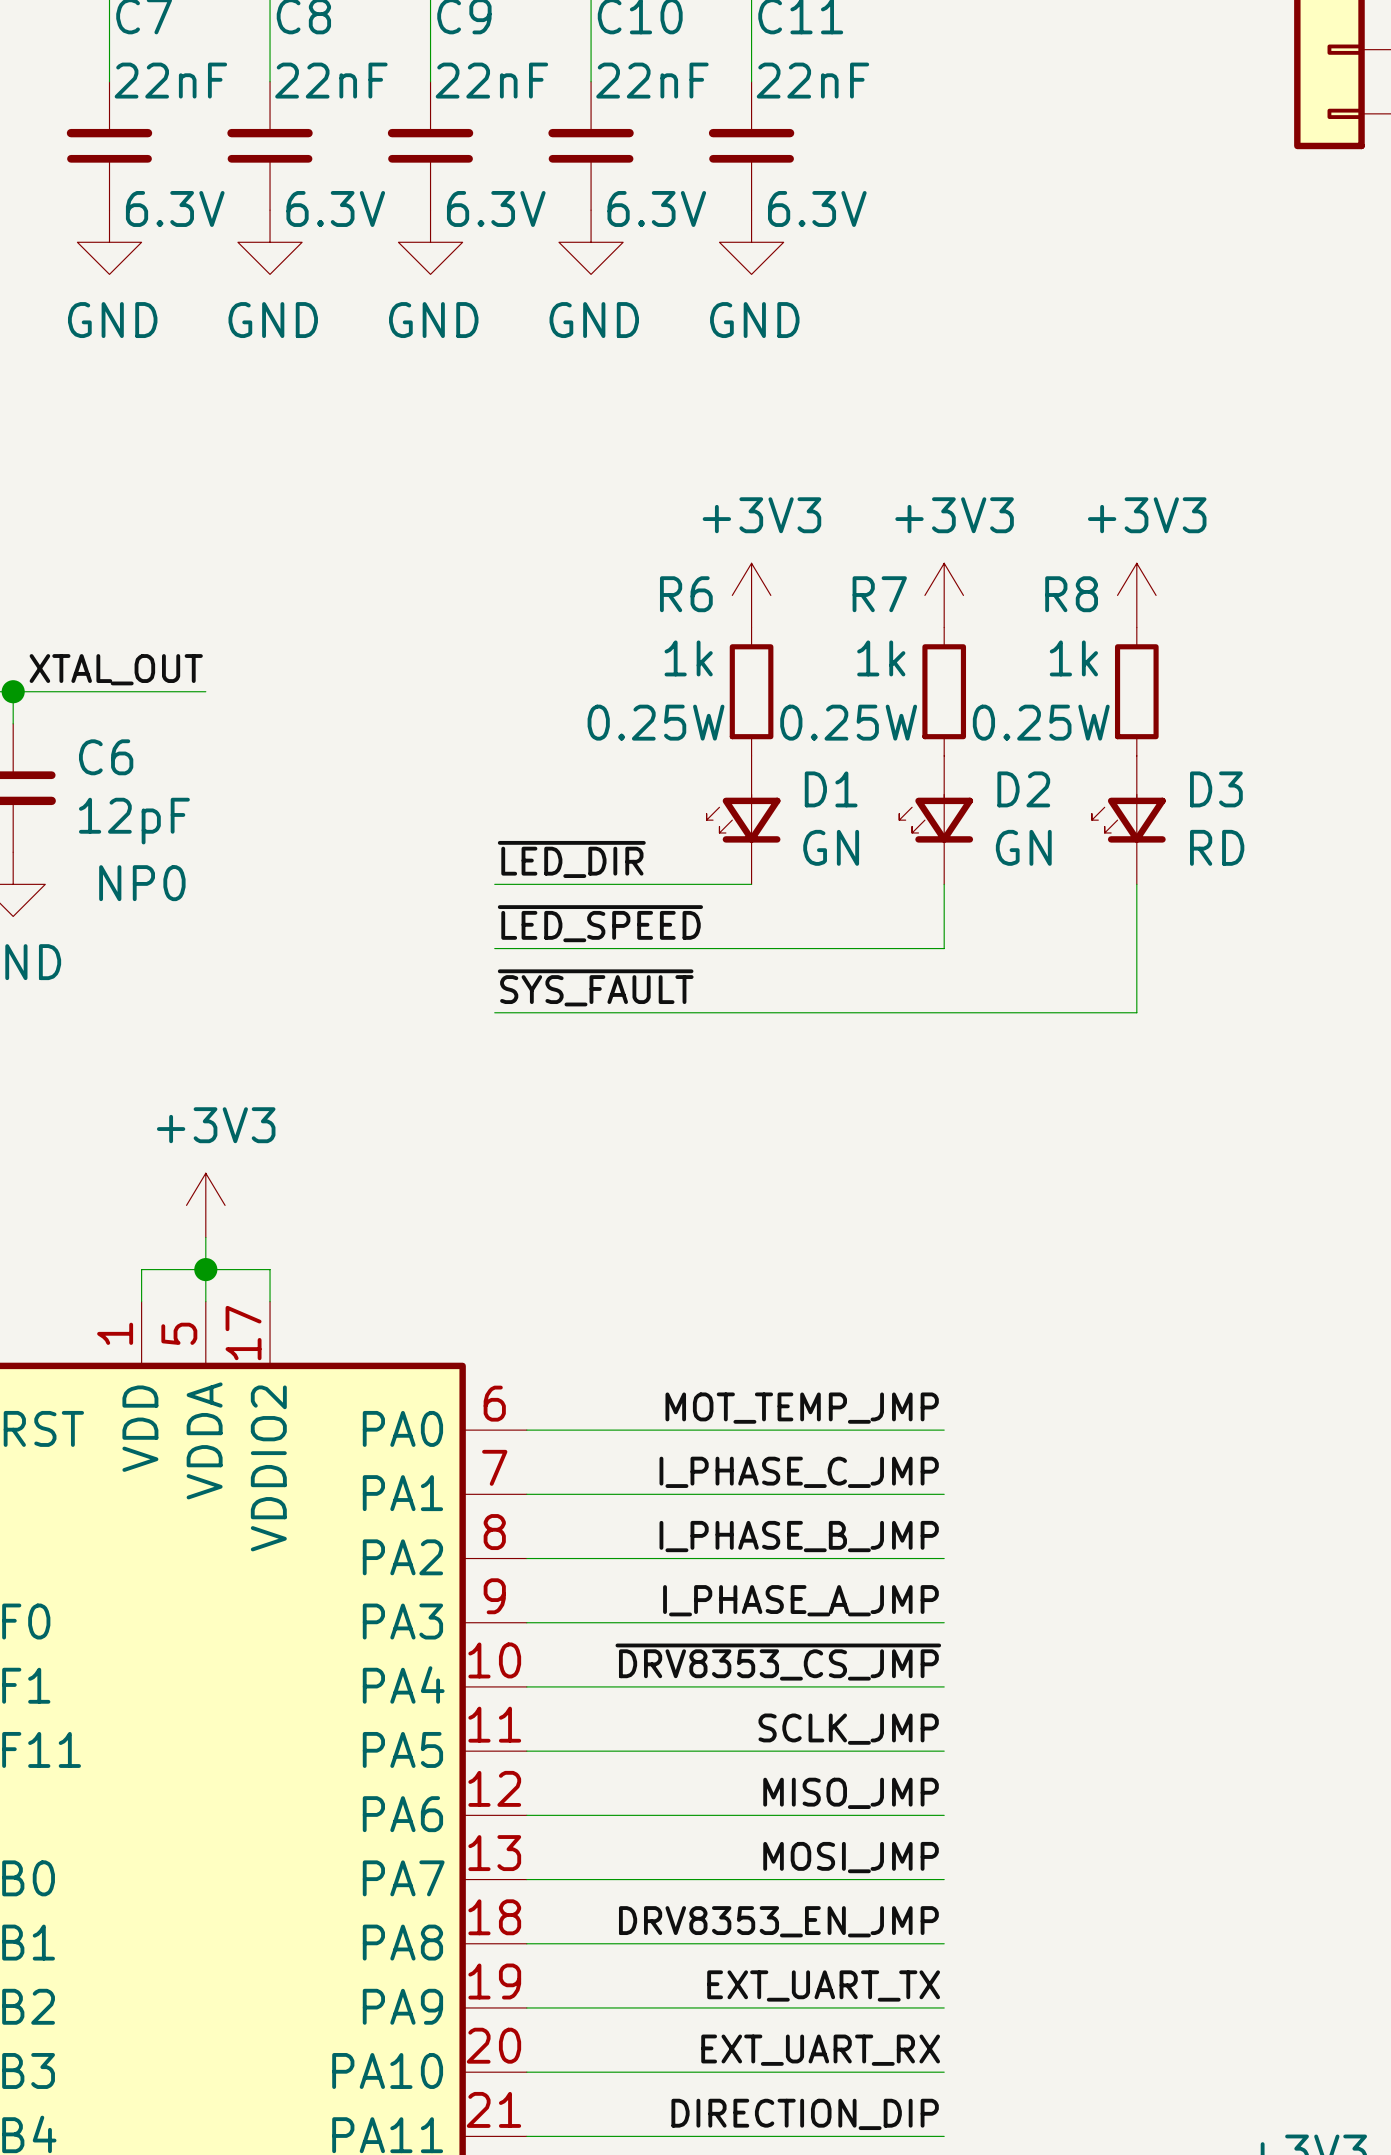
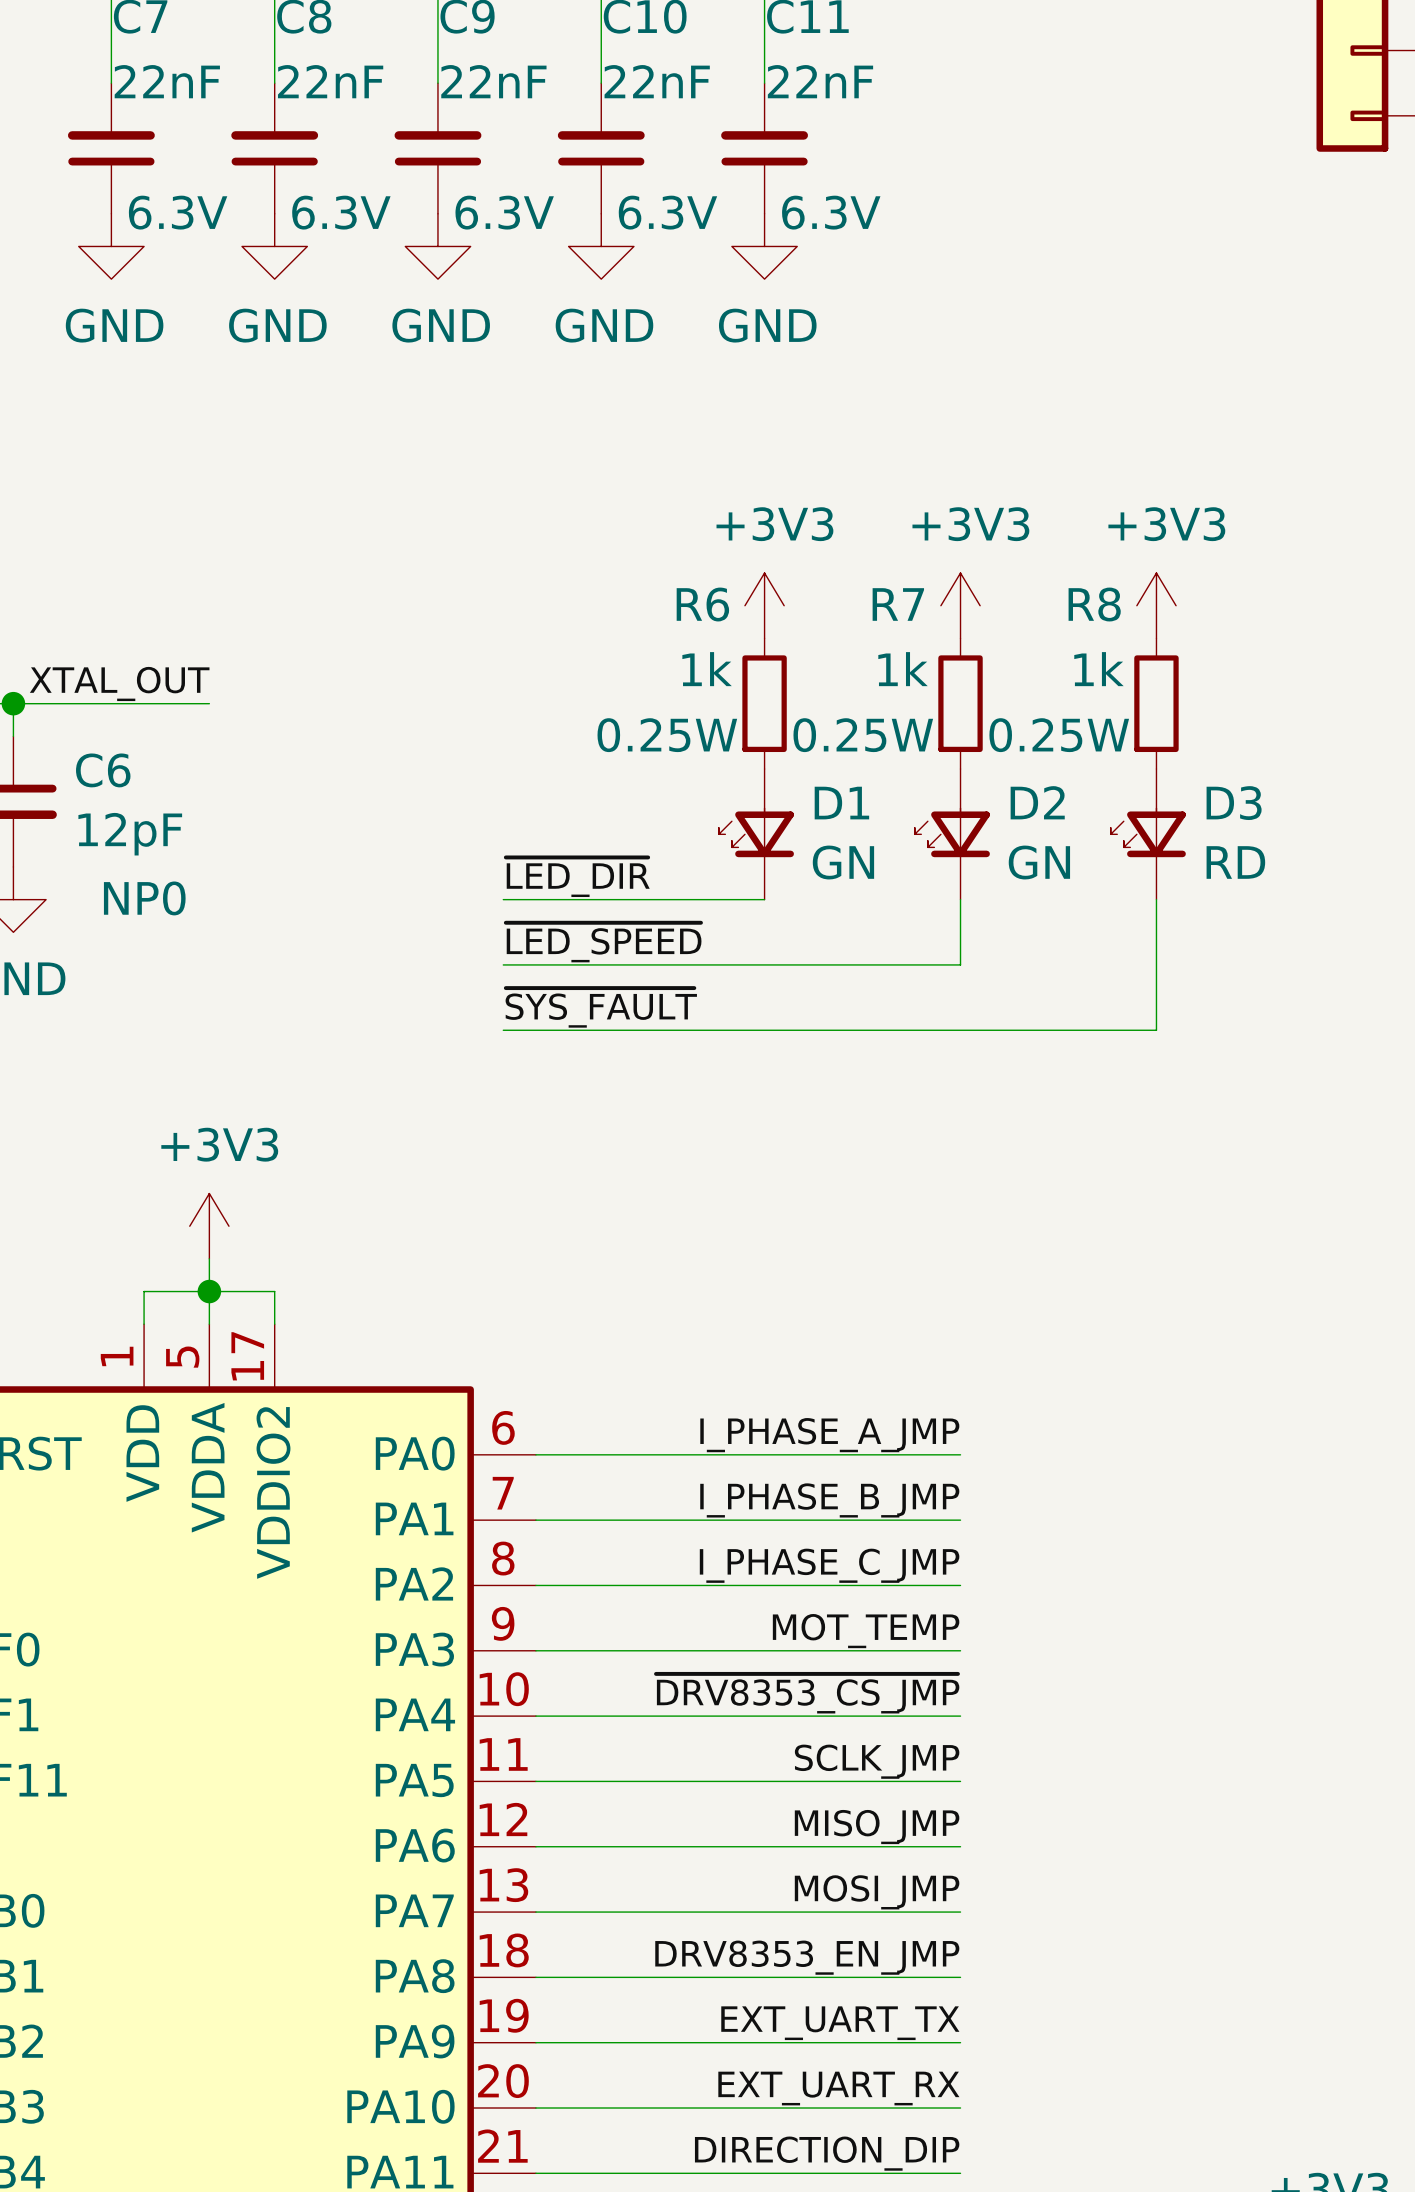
label: MOT_TEMP_JMP (802, 1408) -> I_PHASE_A_JMP (829, 1435)
label: I_PHASE_C_JMP (799, 1472) -> I_PHASE_B_JMP (829, 1500)
label: I_PHASE_B_JMP (799, 1536) -> I_PHASE_C_JMP (829, 1565)
label: I_PHASE_A_JMP (800, 1600) -> MOT_TEMP (866, 1631)

